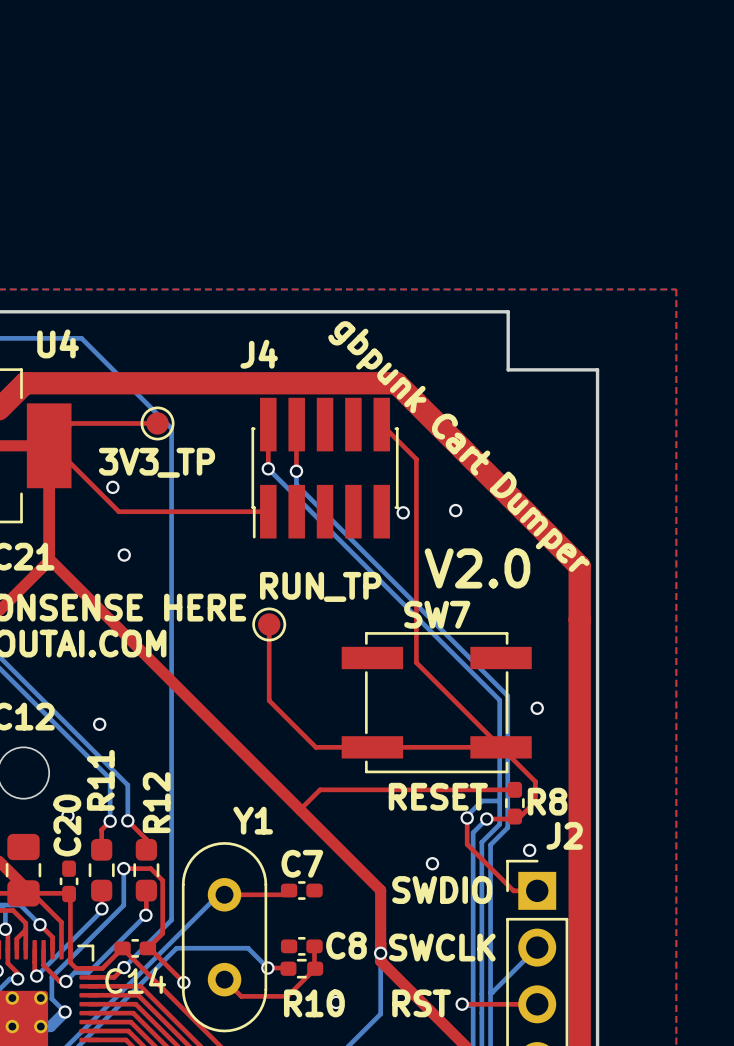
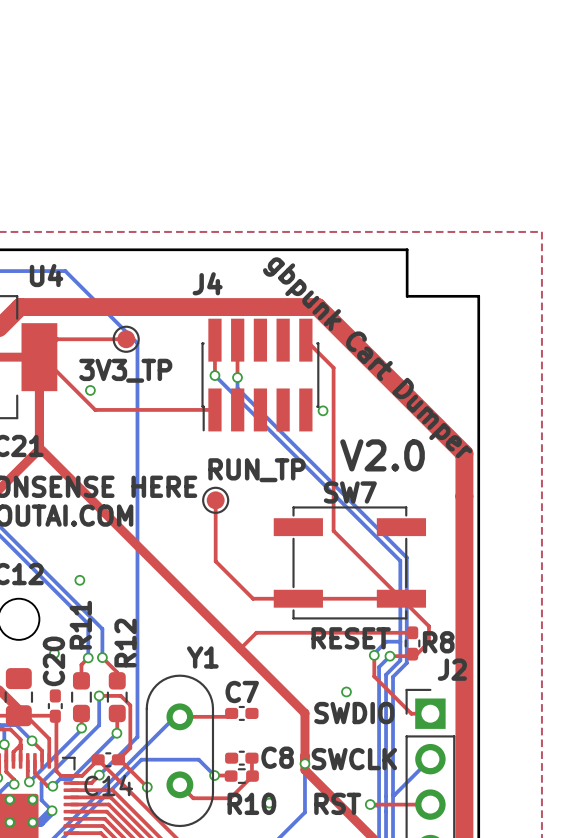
via: (455, 510) -> none
via: (124, 555) -> none
via: (537, 708) -> none
via: (529, 850) -> none

